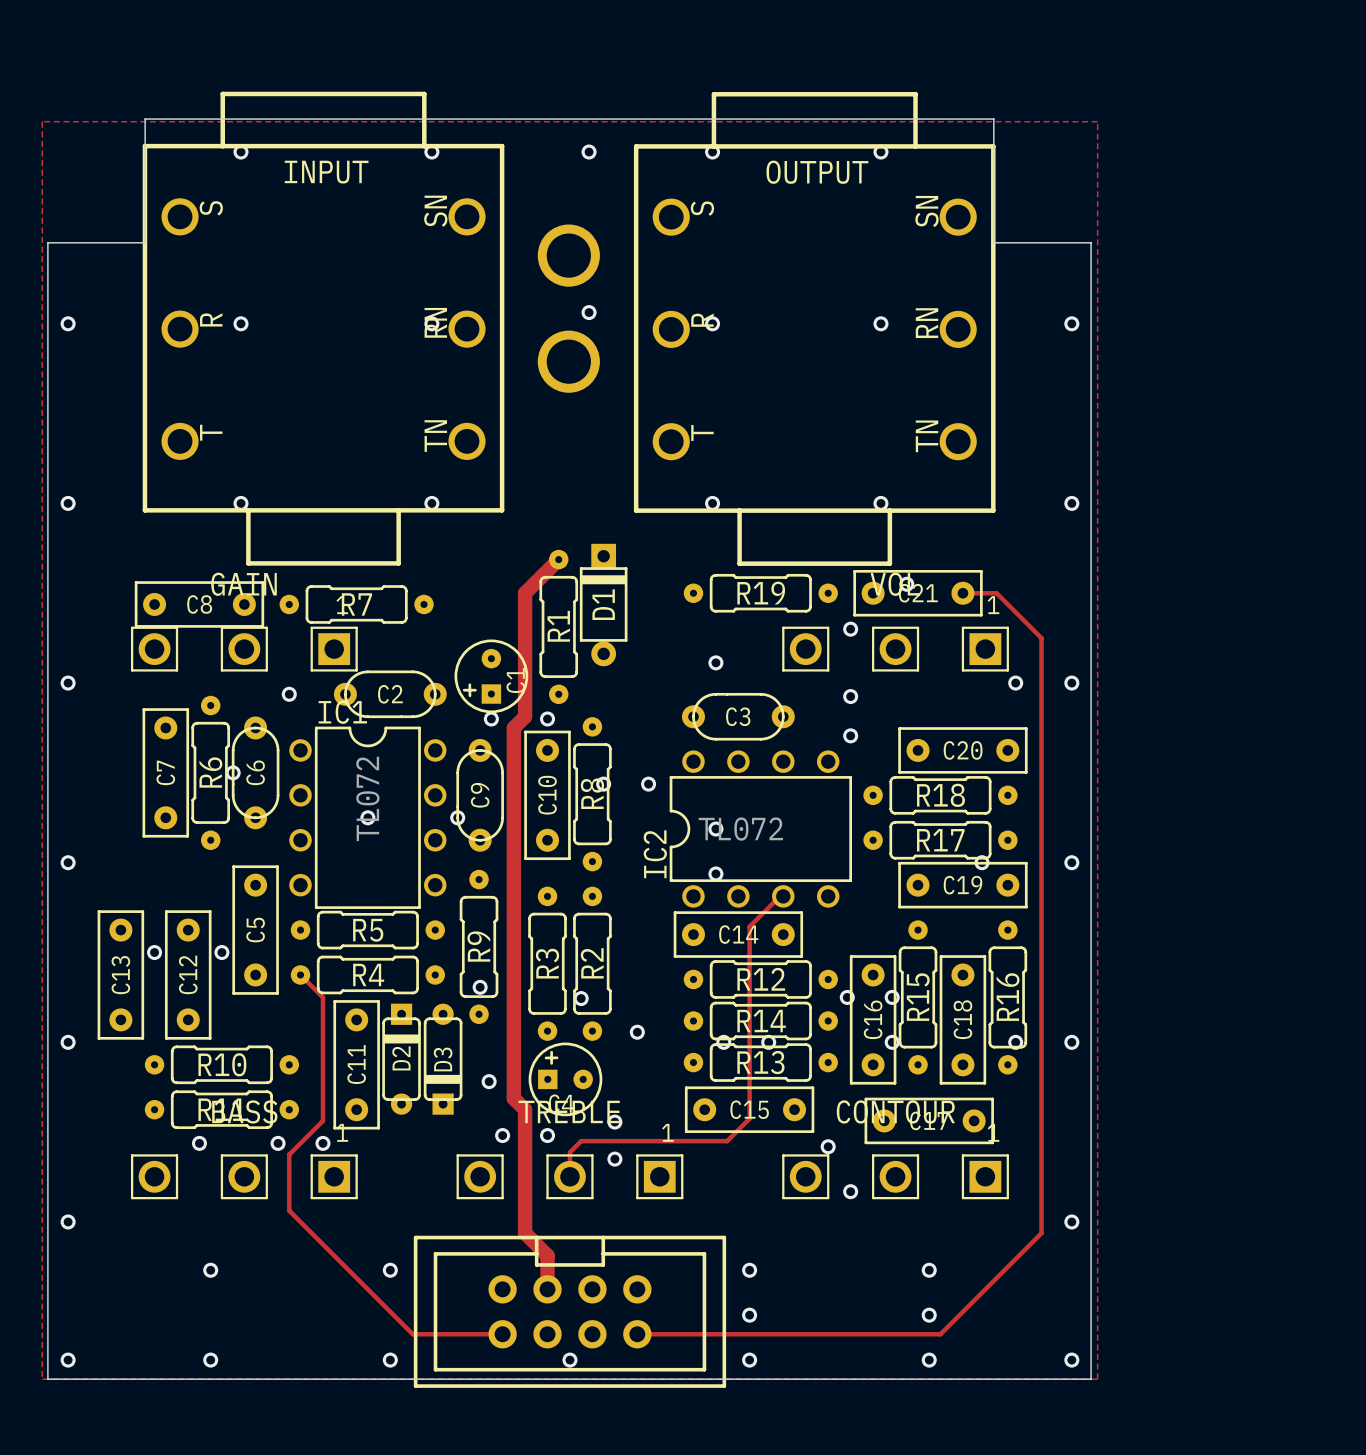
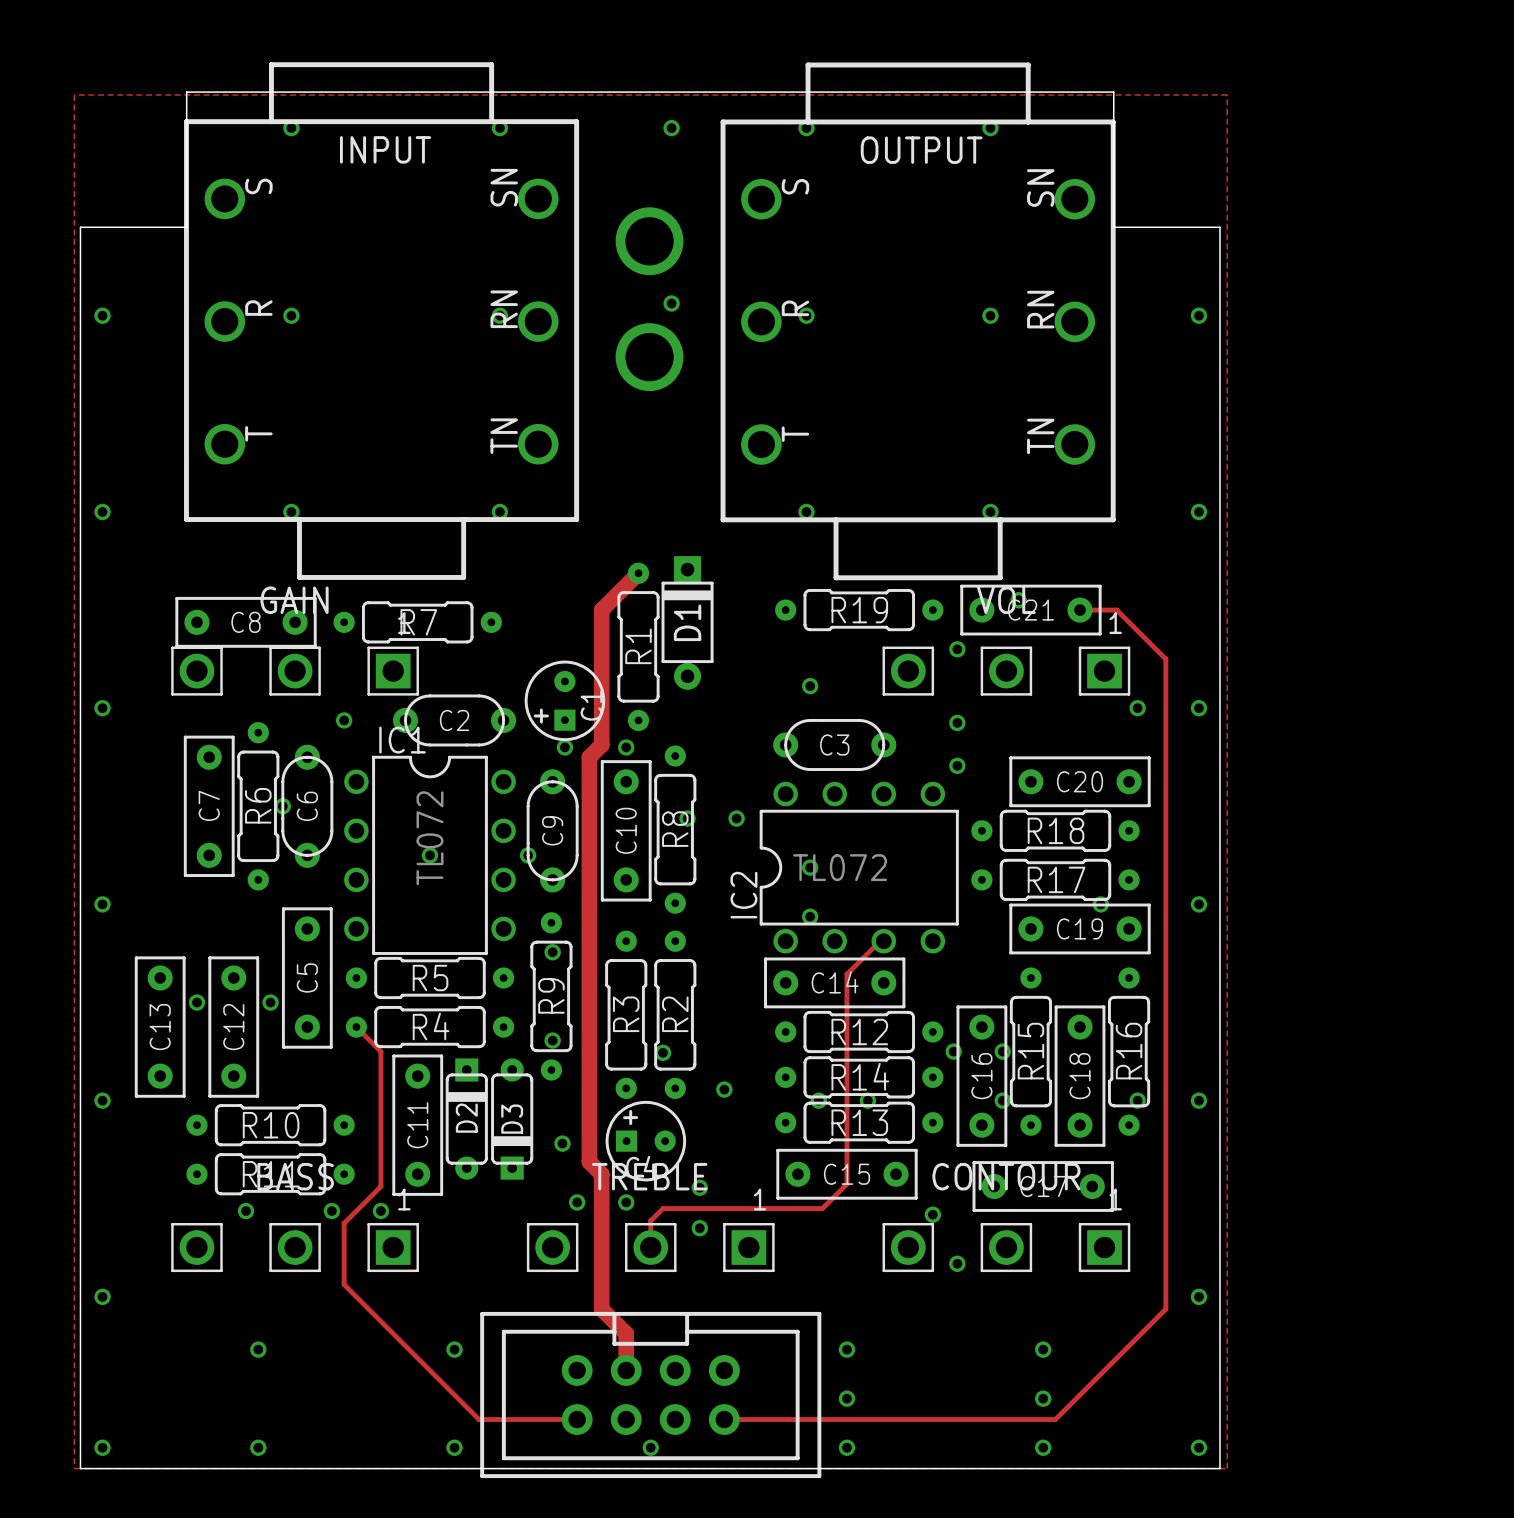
via: none -> (552, 952)

